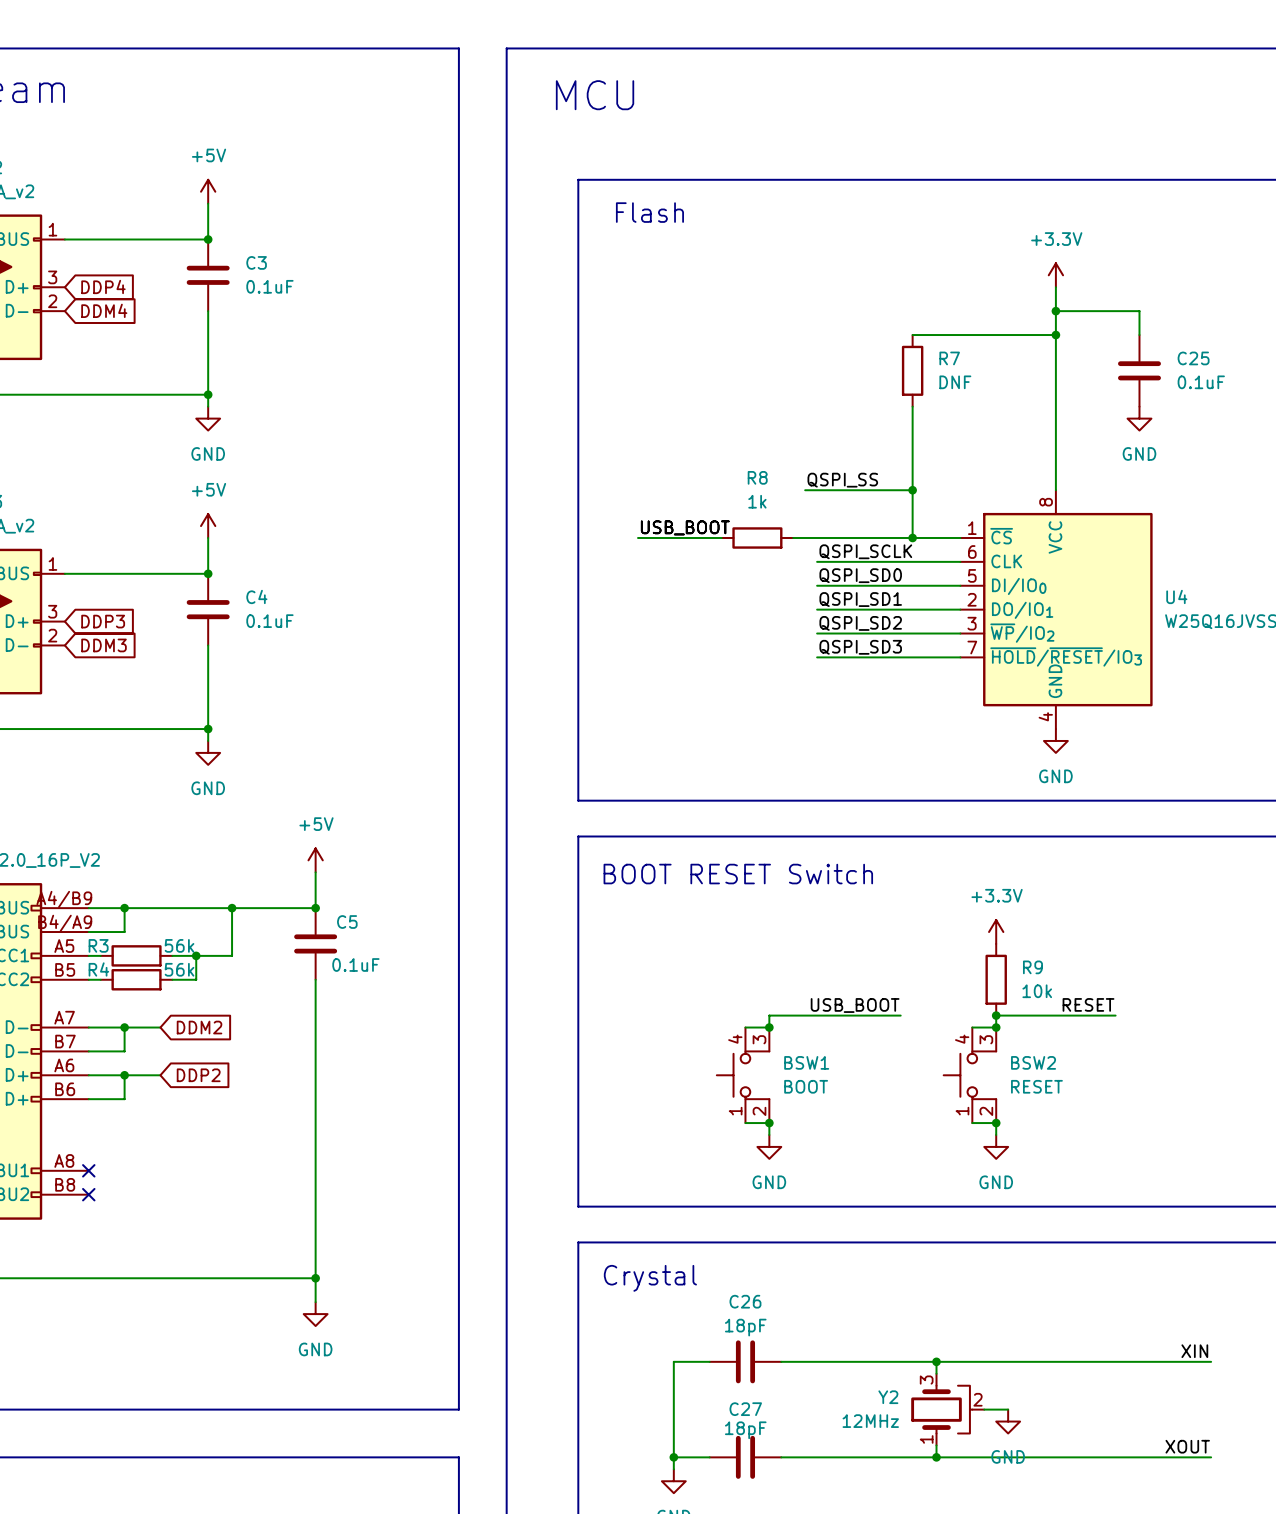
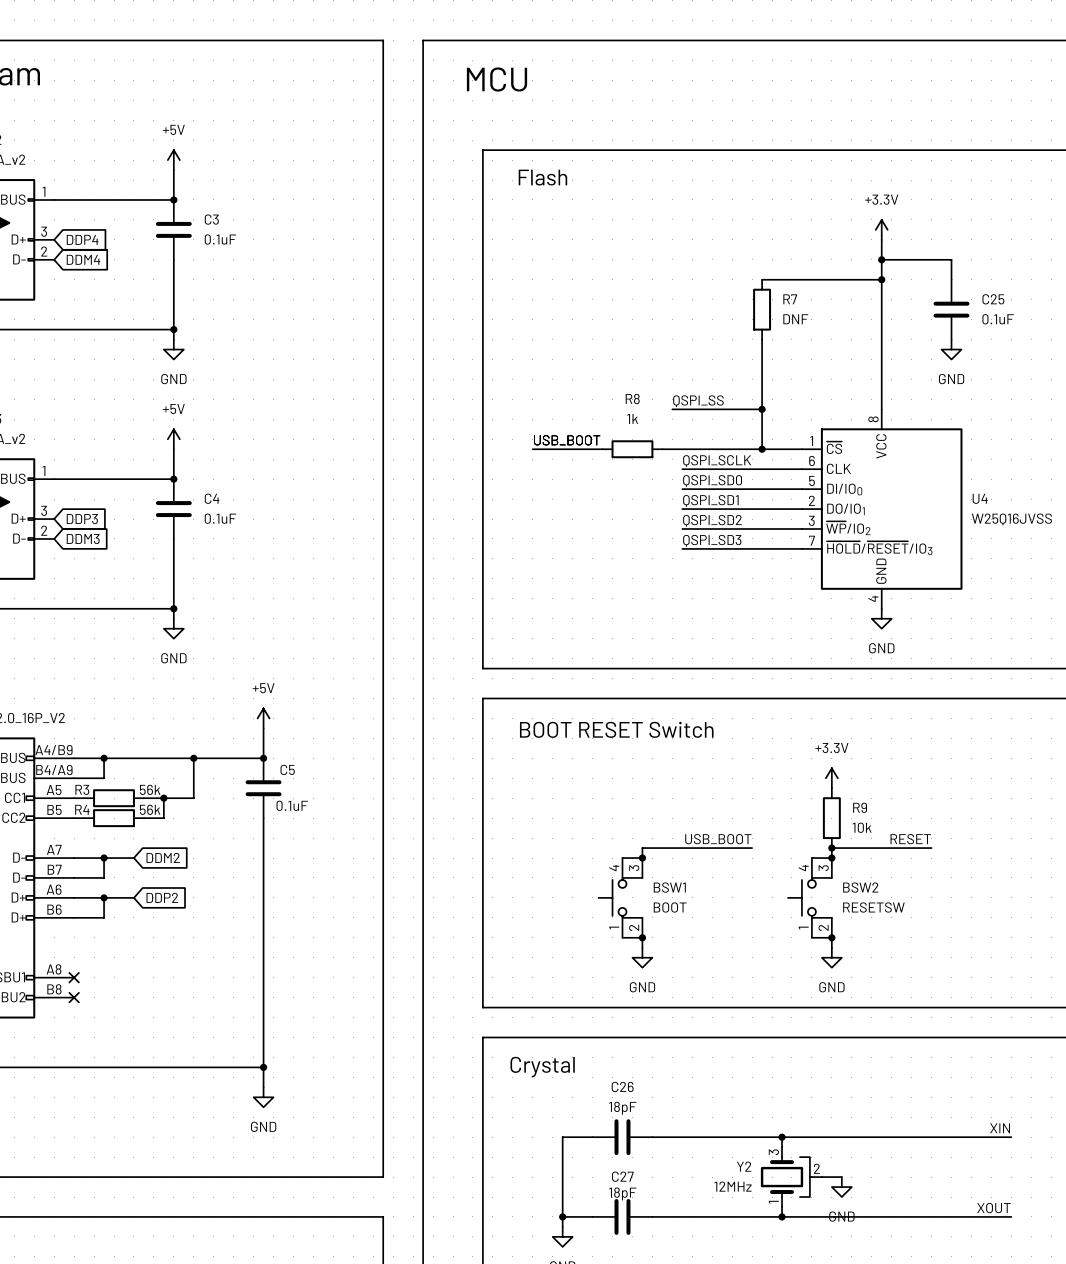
BSW2 value: RESET (1036, 1086) -> RESETSW (873, 907)

